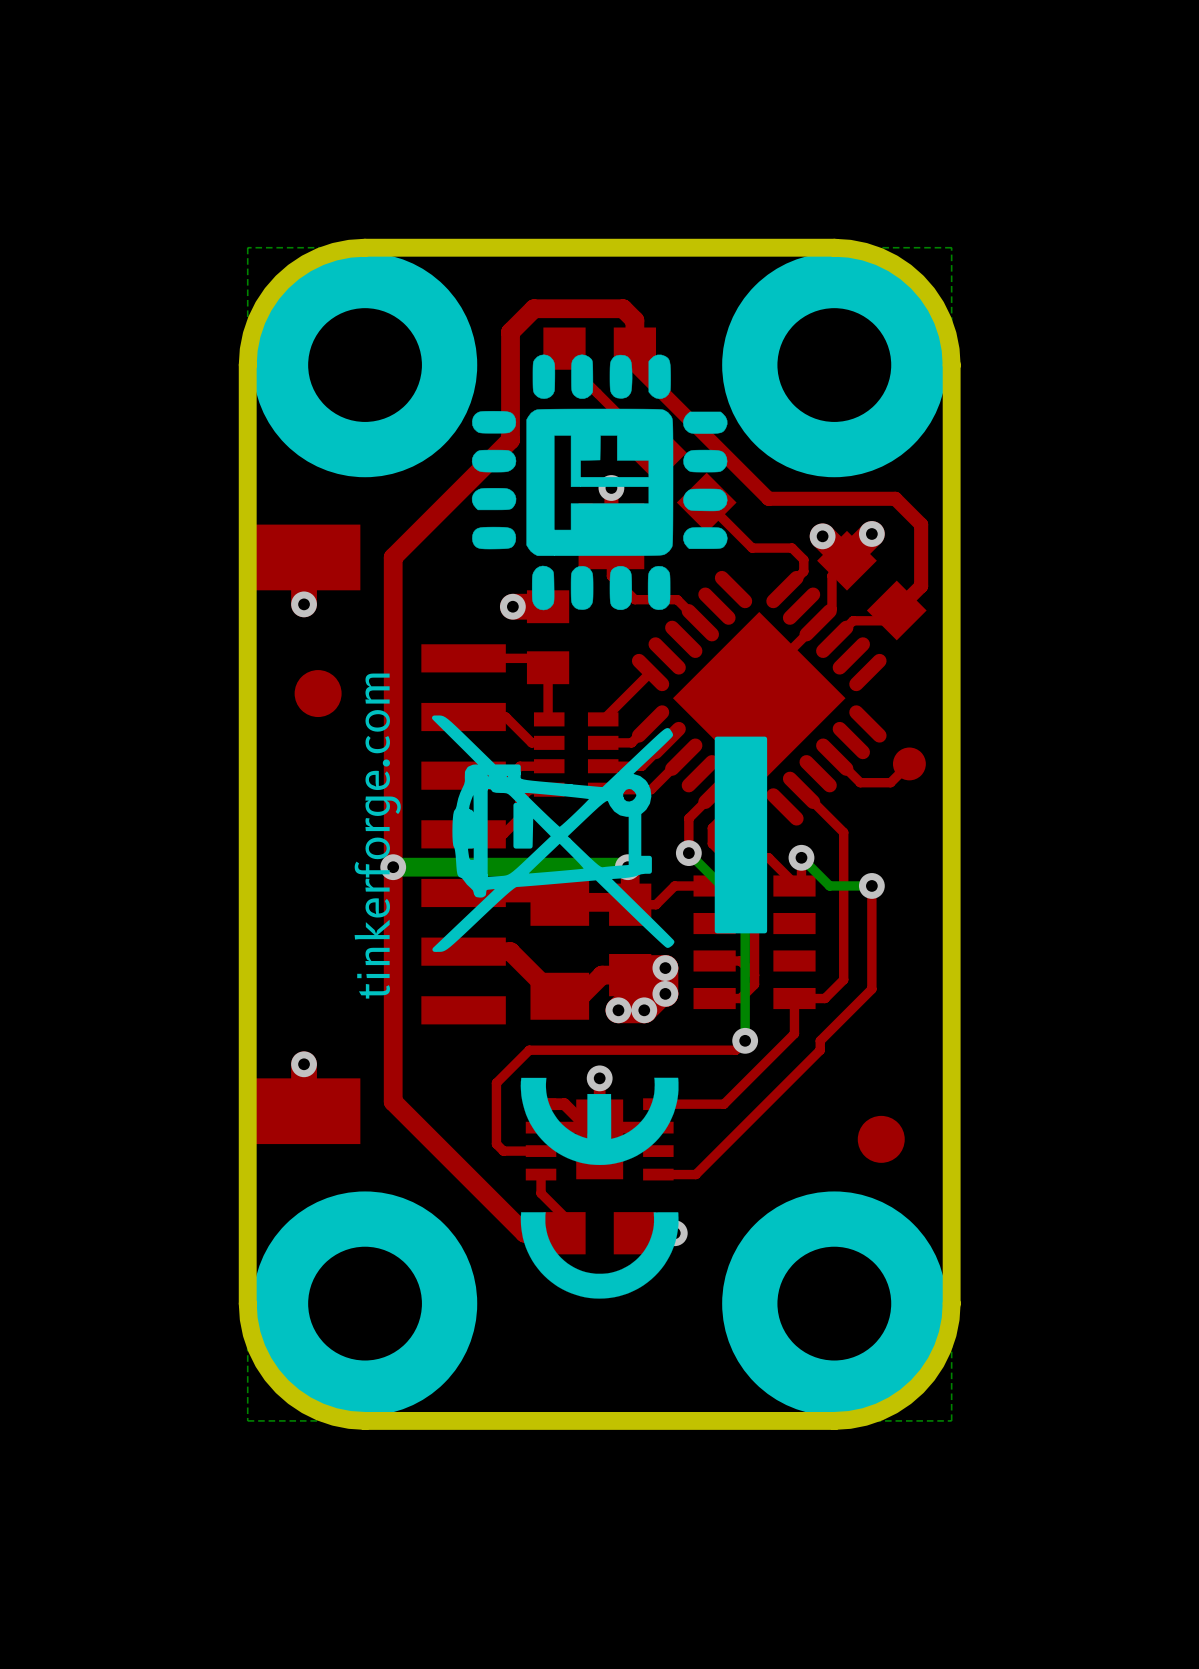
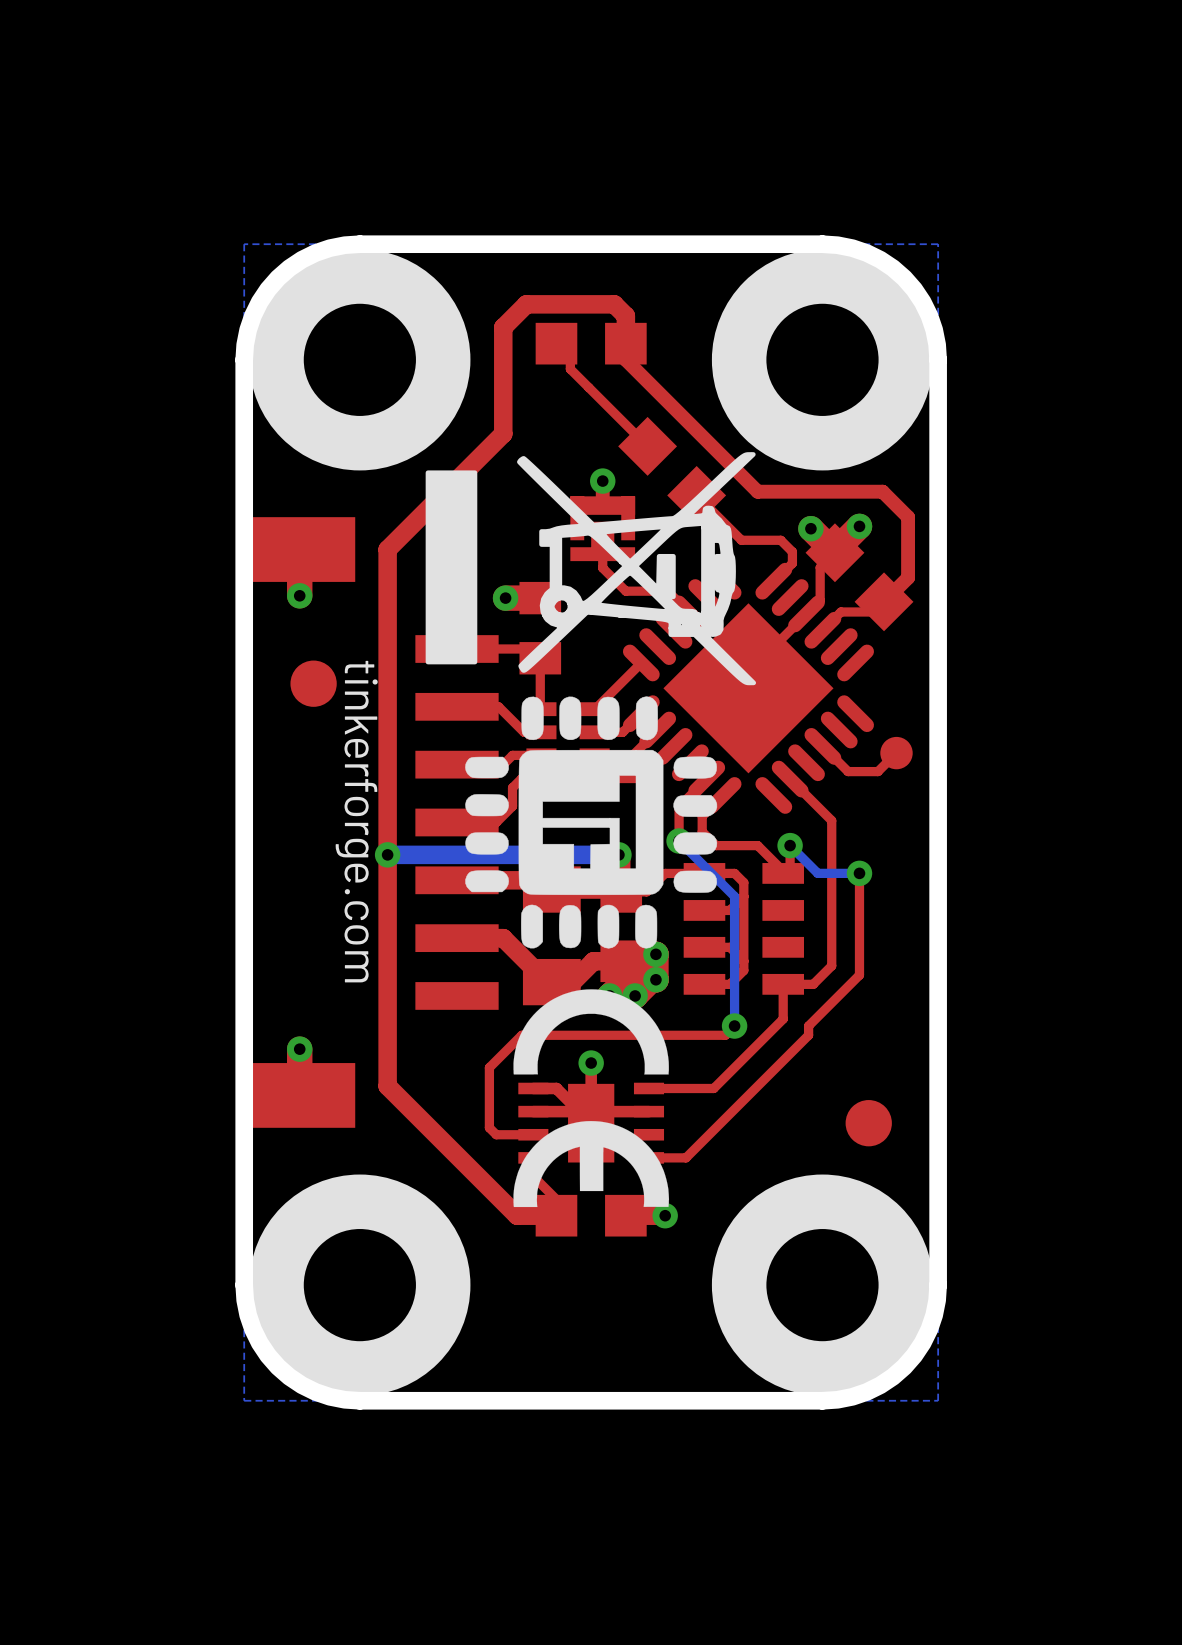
drawing: [471, 354, 728, 611] -> none
drawing: none -> [425, 452, 757, 686]
drawing shape: [431, 715, 768, 952] -> [465, 696, 718, 949]
text rotation: 0° (377, 836) -> 180° (356, 821)
drawing: none -> [513, 989, 670, 1208]
drawing: [520, 1077, 679, 1299] -> none

